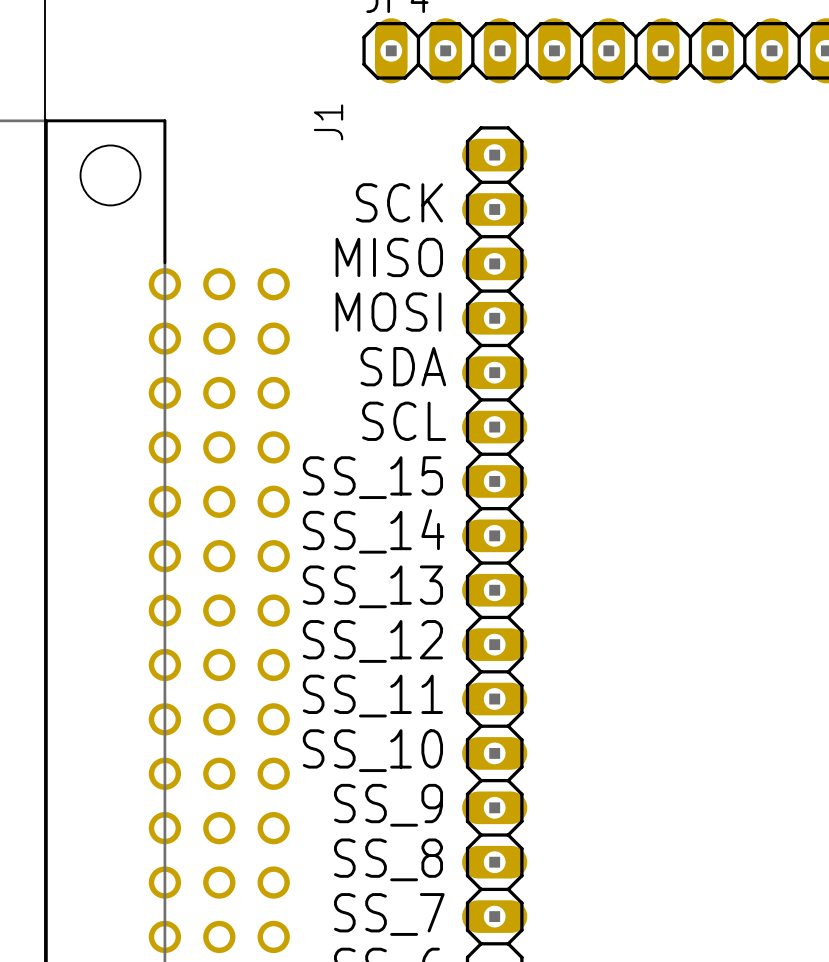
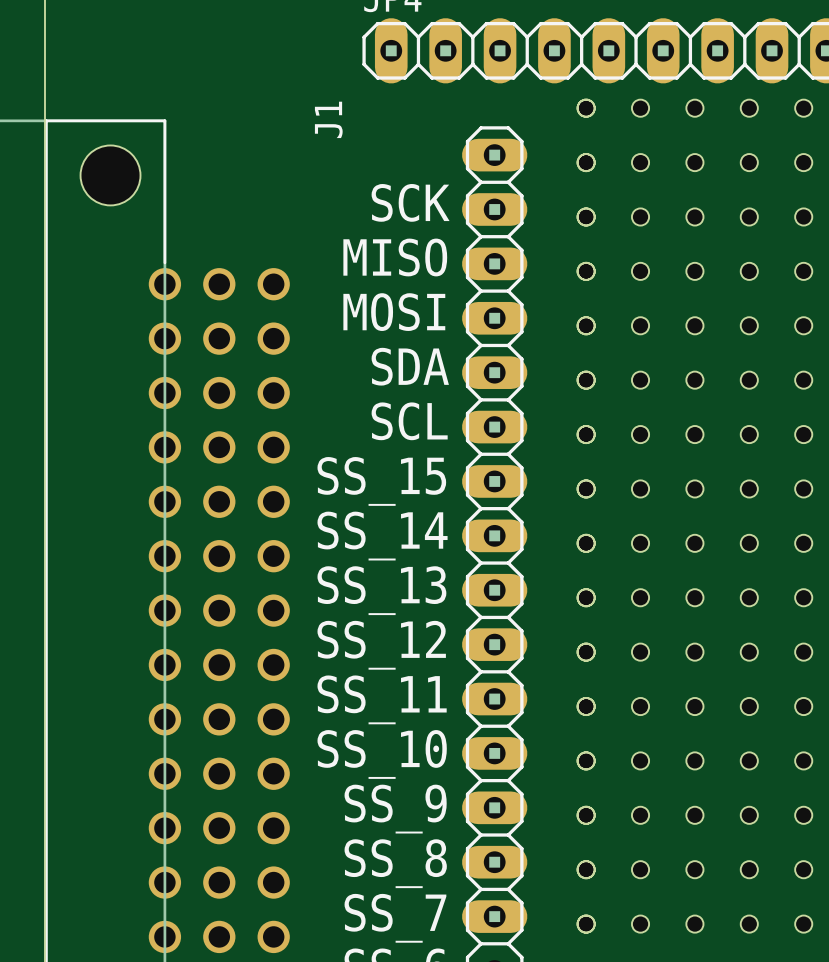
hole: none -> (586, 108)
hole: none -> (640, 108)
hole: none -> (694, 108)
hole: none -> (749, 108)
hole: none -> (803, 108)
hole: none -> (586, 162)
hole: none -> (640, 162)
hole: none -> (694, 162)
hole: none -> (749, 162)
hole: none -> (803, 162)
hole: none -> (586, 216)
hole: none -> (640, 216)
hole: none -> (694, 216)
hole: none -> (749, 216)
hole: none -> (803, 216)
hole: none -> (586, 271)
hole: none -> (640, 271)
hole: none -> (694, 271)
hole: none -> (749, 271)
hole: none -> (803, 271)
hole: none -> (586, 325)
hole: none -> (640, 325)
hole: none -> (694, 325)
hole: none -> (749, 325)
hole: none -> (803, 325)
hole: none -> (586, 380)
hole: none -> (640, 380)
hole: none -> (694, 380)
hole: none -> (749, 380)
hole: none -> (803, 380)
hole: none -> (586, 434)
hole: none -> (640, 434)
hole: none -> (694, 434)
hole: none -> (749, 434)
hole: none -> (803, 434)
hole: none -> (586, 488)
hole: none -> (640, 488)
hole: none -> (694, 488)
hole: none -> (749, 488)
hole: none -> (803, 488)
hole: none -> (586, 543)
hole: none -> (640, 543)
hole: none -> (694, 543)
hole: none -> (749, 543)
hole: none -> (803, 543)
hole: none -> (586, 597)
hole: none -> (640, 597)
hole: none -> (694, 597)
hole: none -> (749, 597)
hole: none -> (803, 597)
hole: none -> (586, 652)
hole: none -> (640, 652)
hole: none -> (694, 652)
hole: none -> (749, 652)
hole: none -> (803, 652)
hole: none -> (586, 706)
hole: none -> (640, 706)
hole: none -> (694, 706)
hole: none -> (749, 706)
hole: none -> (803, 706)
hole: none -> (586, 760)
hole: none -> (640, 760)
hole: none -> (694, 760)
hole: none -> (749, 760)
hole: none -> (803, 760)
hole: none -> (586, 815)
hole: none -> (640, 815)
hole: none -> (694, 815)
hole: none -> (749, 815)
hole: none -> (803, 815)
hole: none -> (586, 869)
hole: none -> (640, 869)
hole: none -> (694, 869)
hole: none -> (749, 869)
hole: none -> (803, 869)
hole: none -> (586, 924)
hole: none -> (640, 924)
hole: none -> (694, 924)
hole: none -> (749, 924)
hole: none -> (803, 924)

